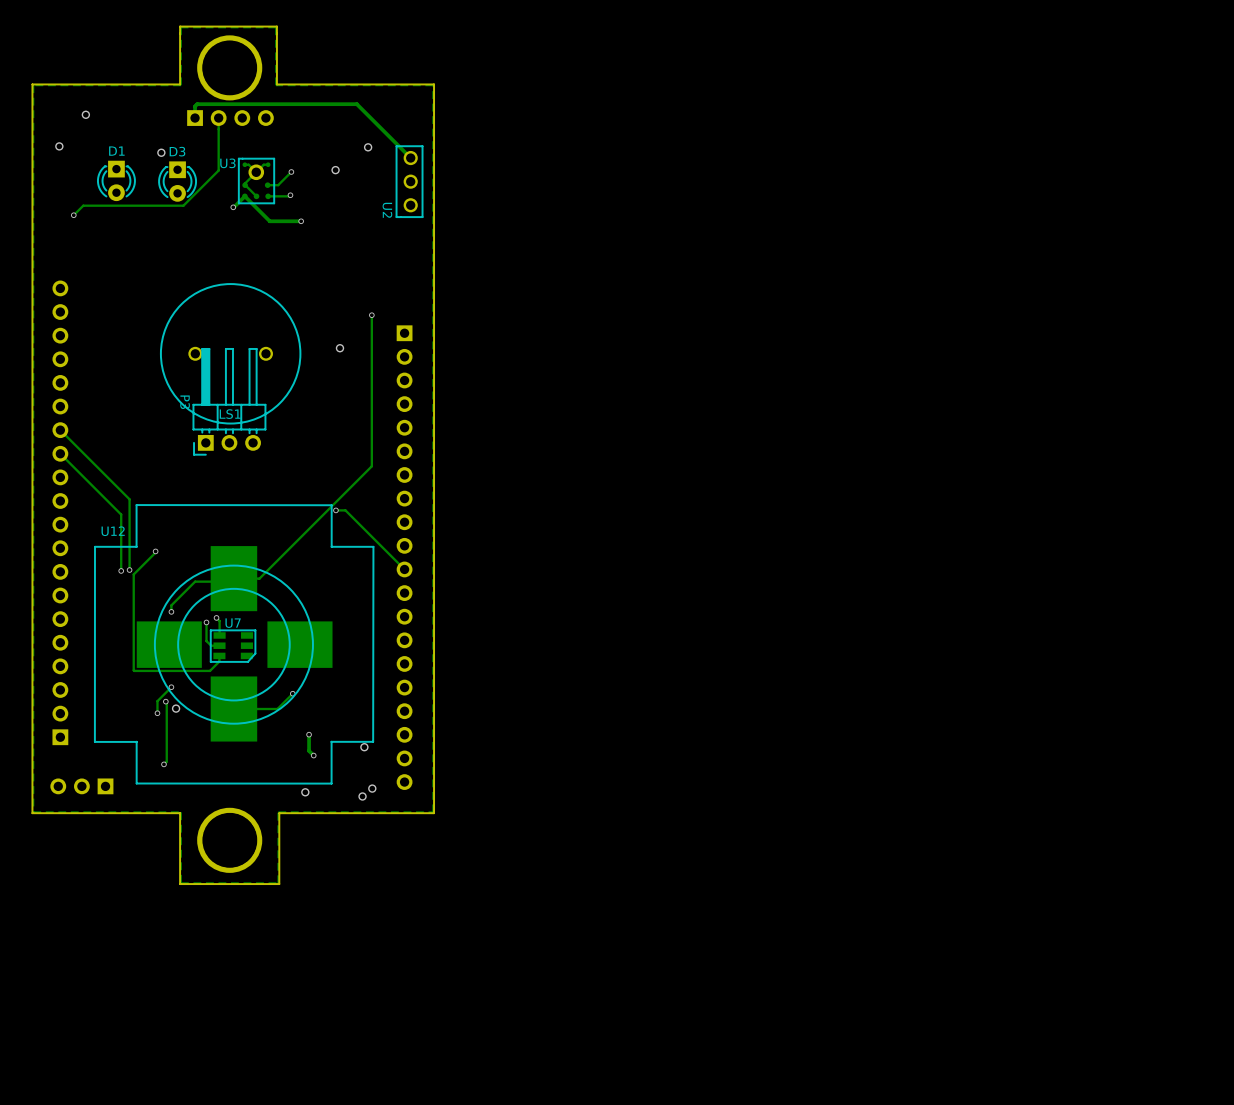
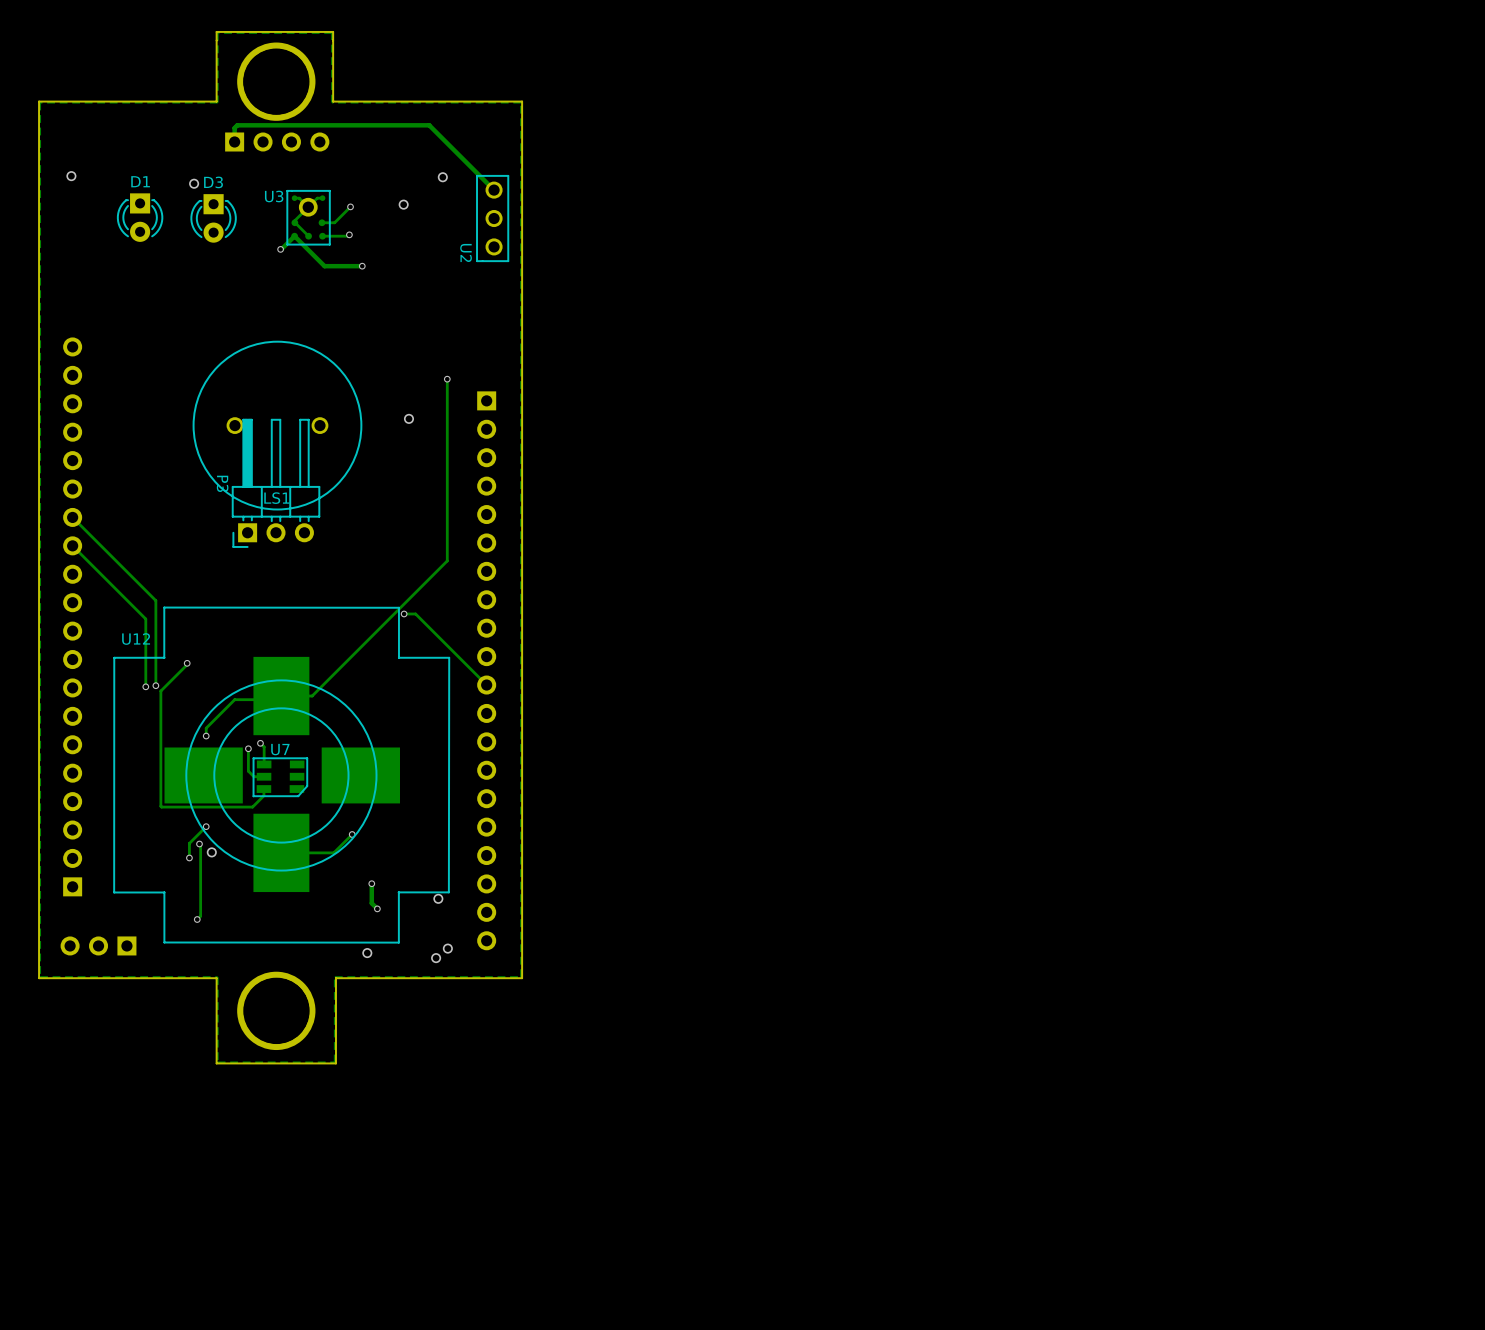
via: (85, 114) -> none
track: (218, 118) (218, 170) (183, 205) (83, 205) (73, 215) -> none
via: (73, 215) -> none

